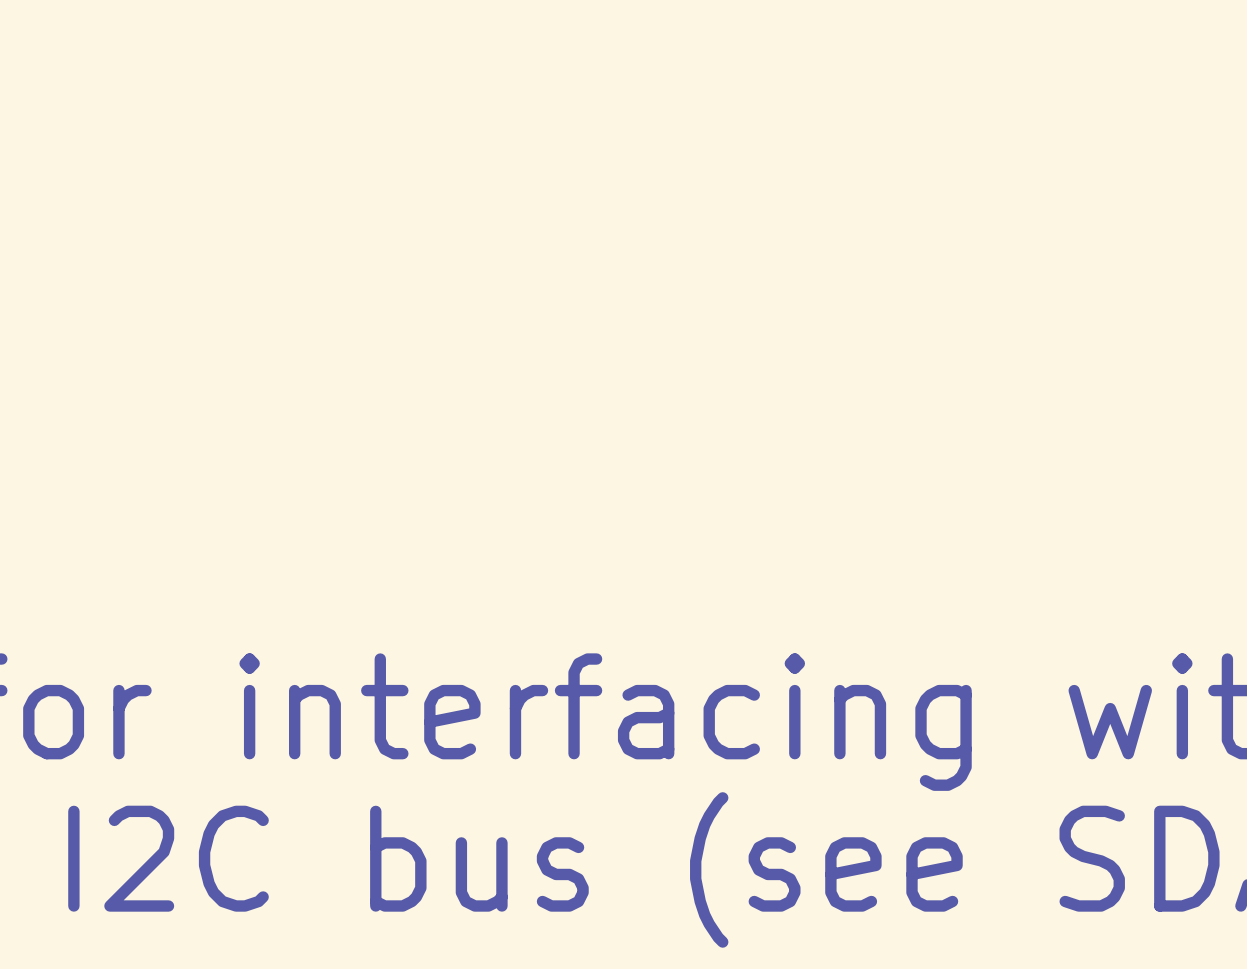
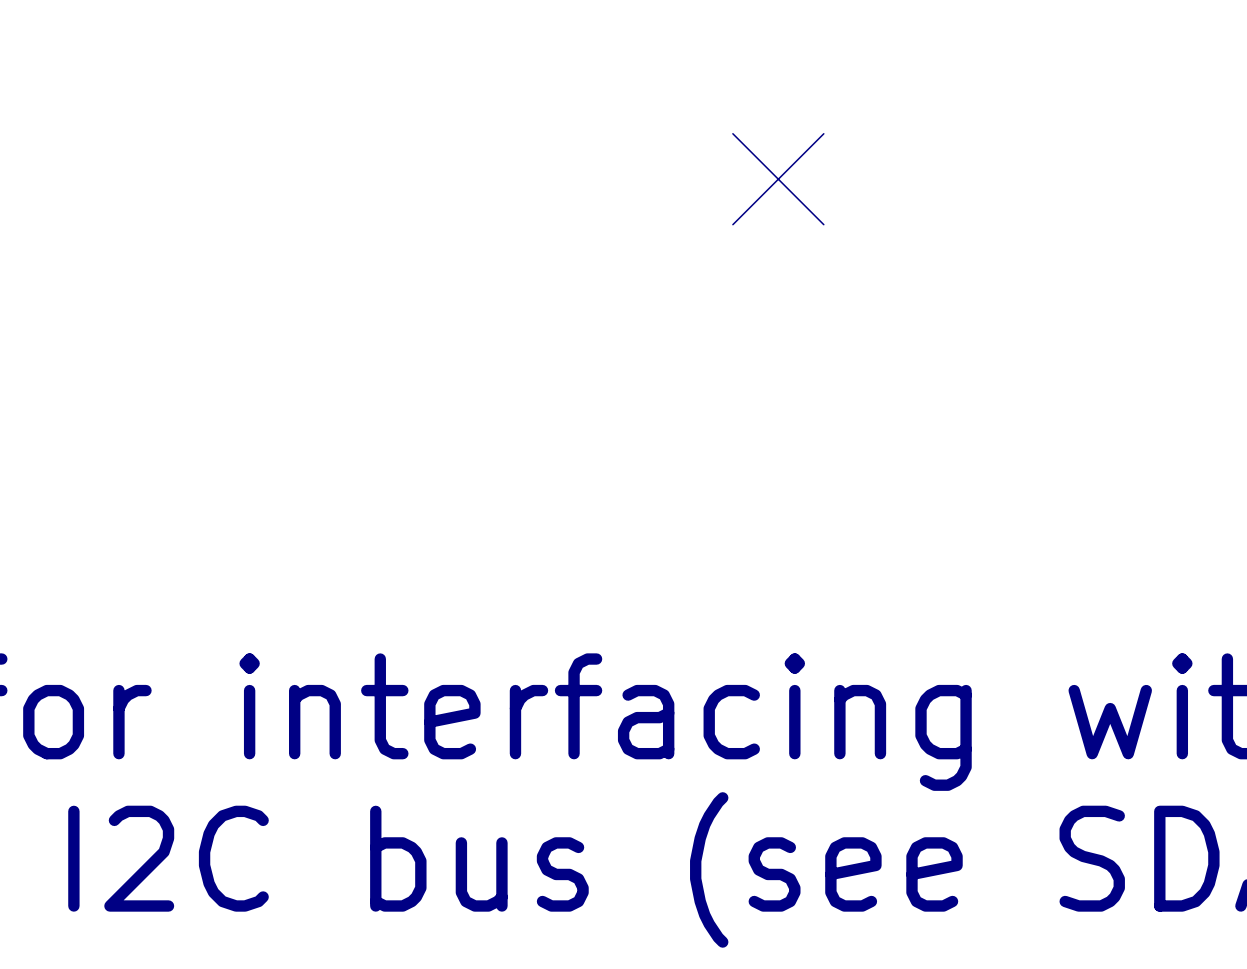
no-connect mark: none -> (778, 179)

